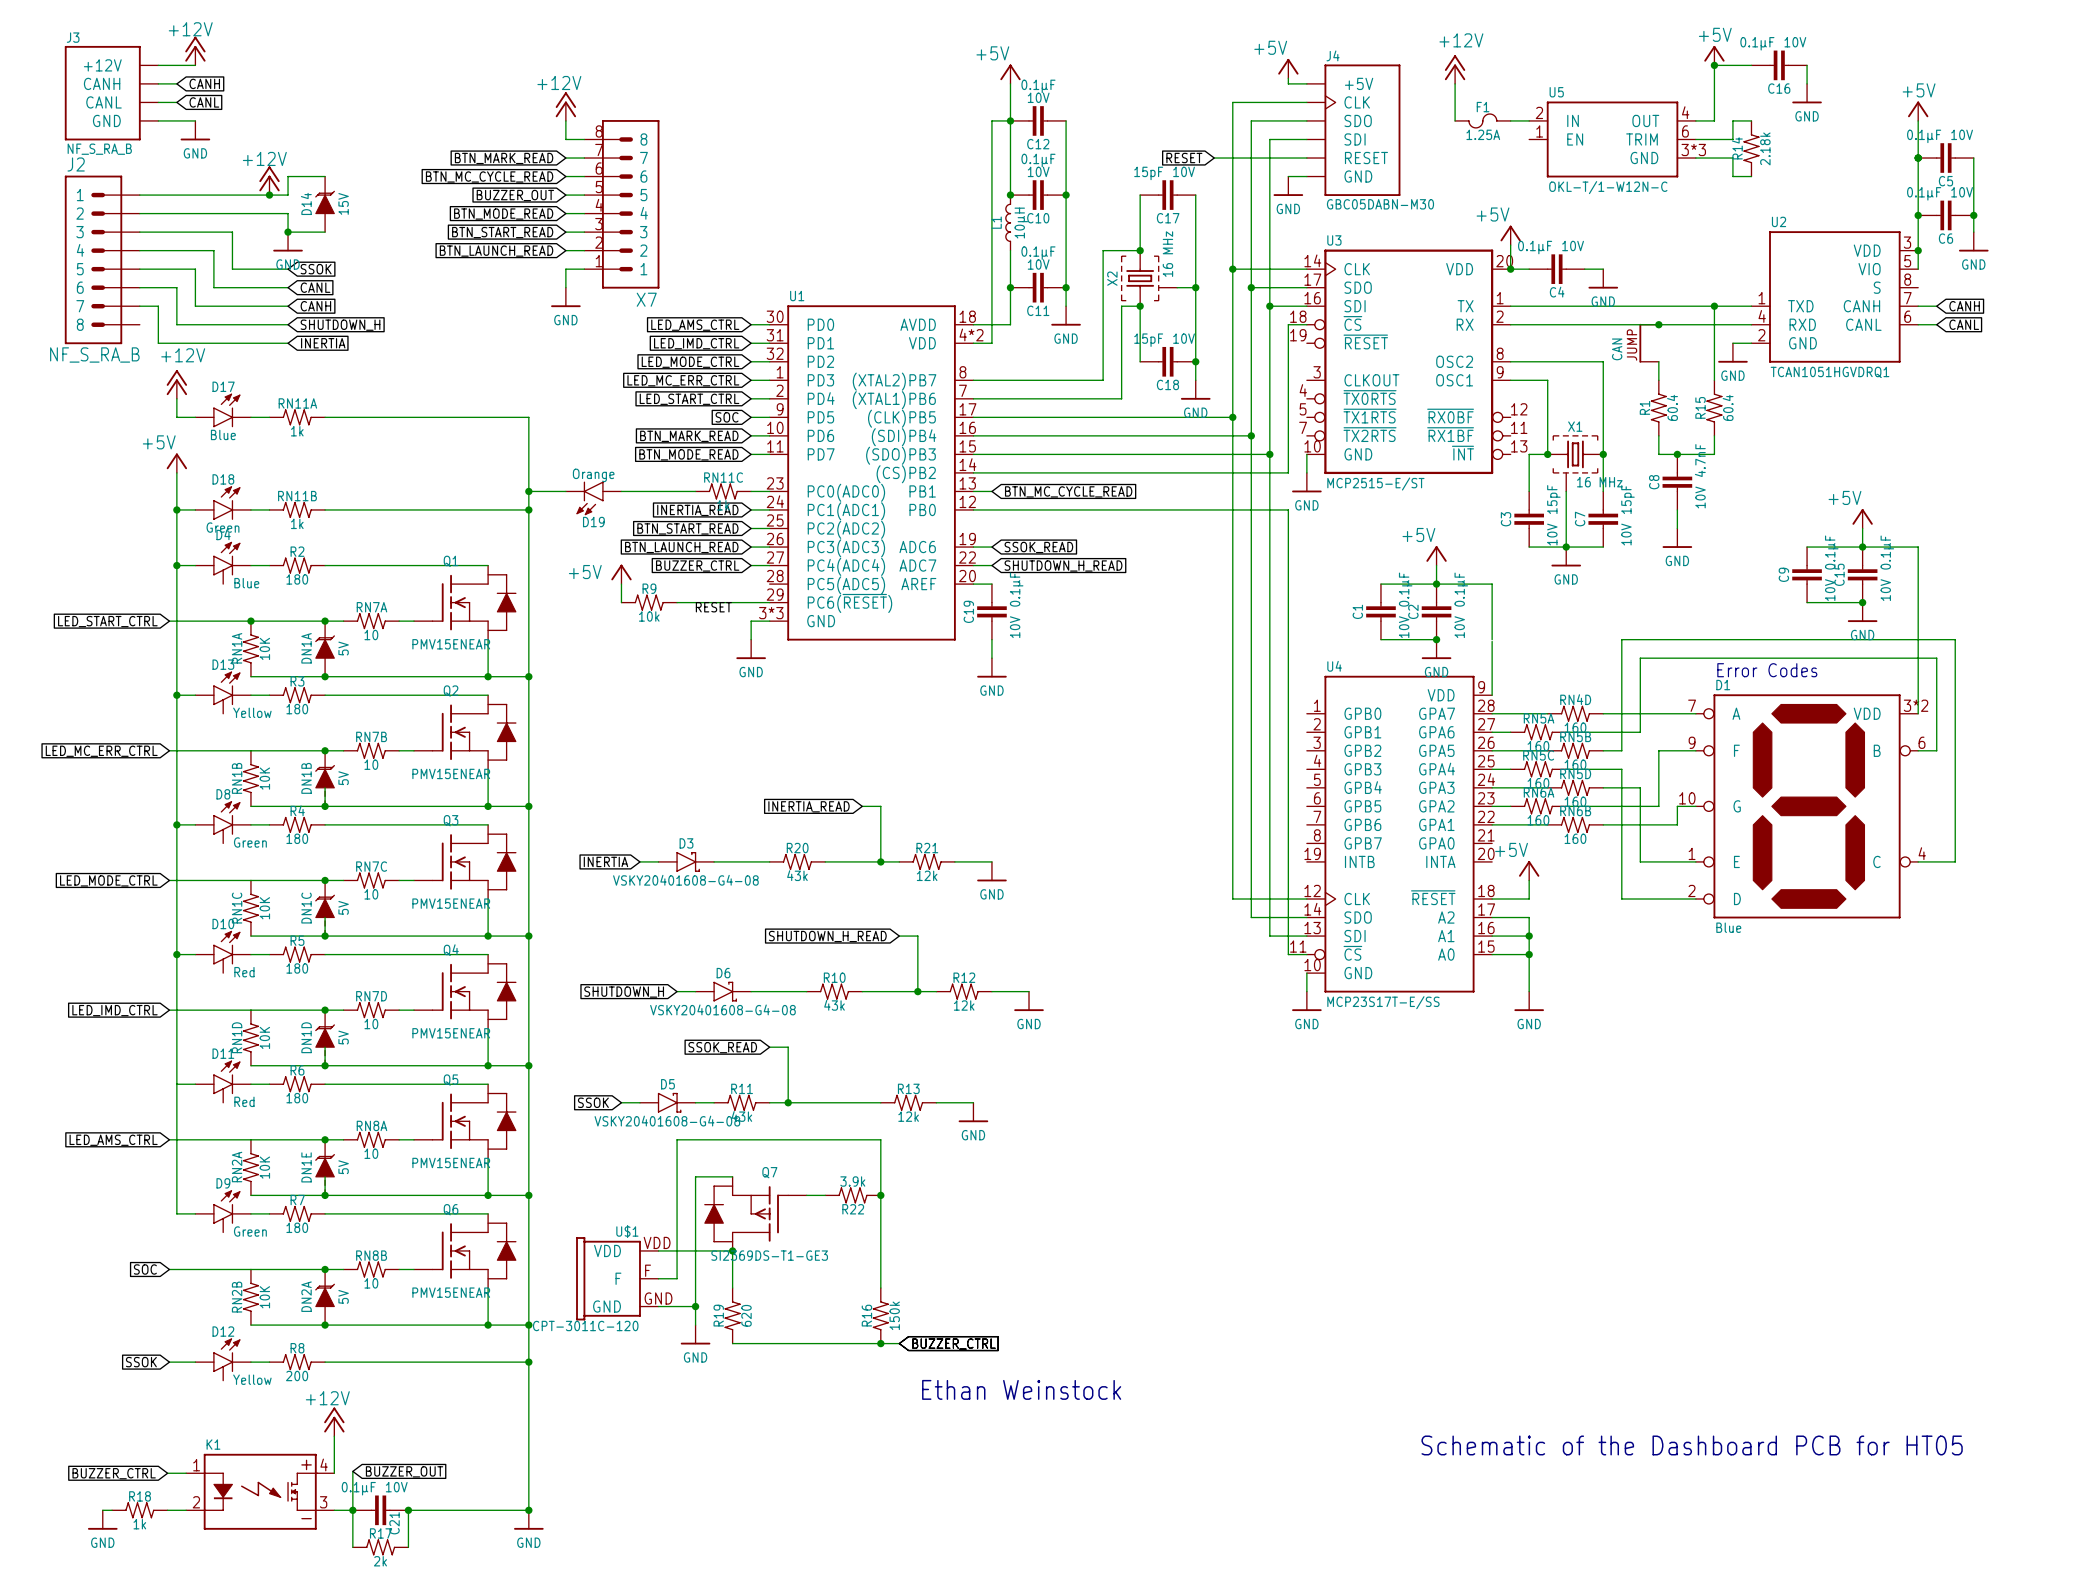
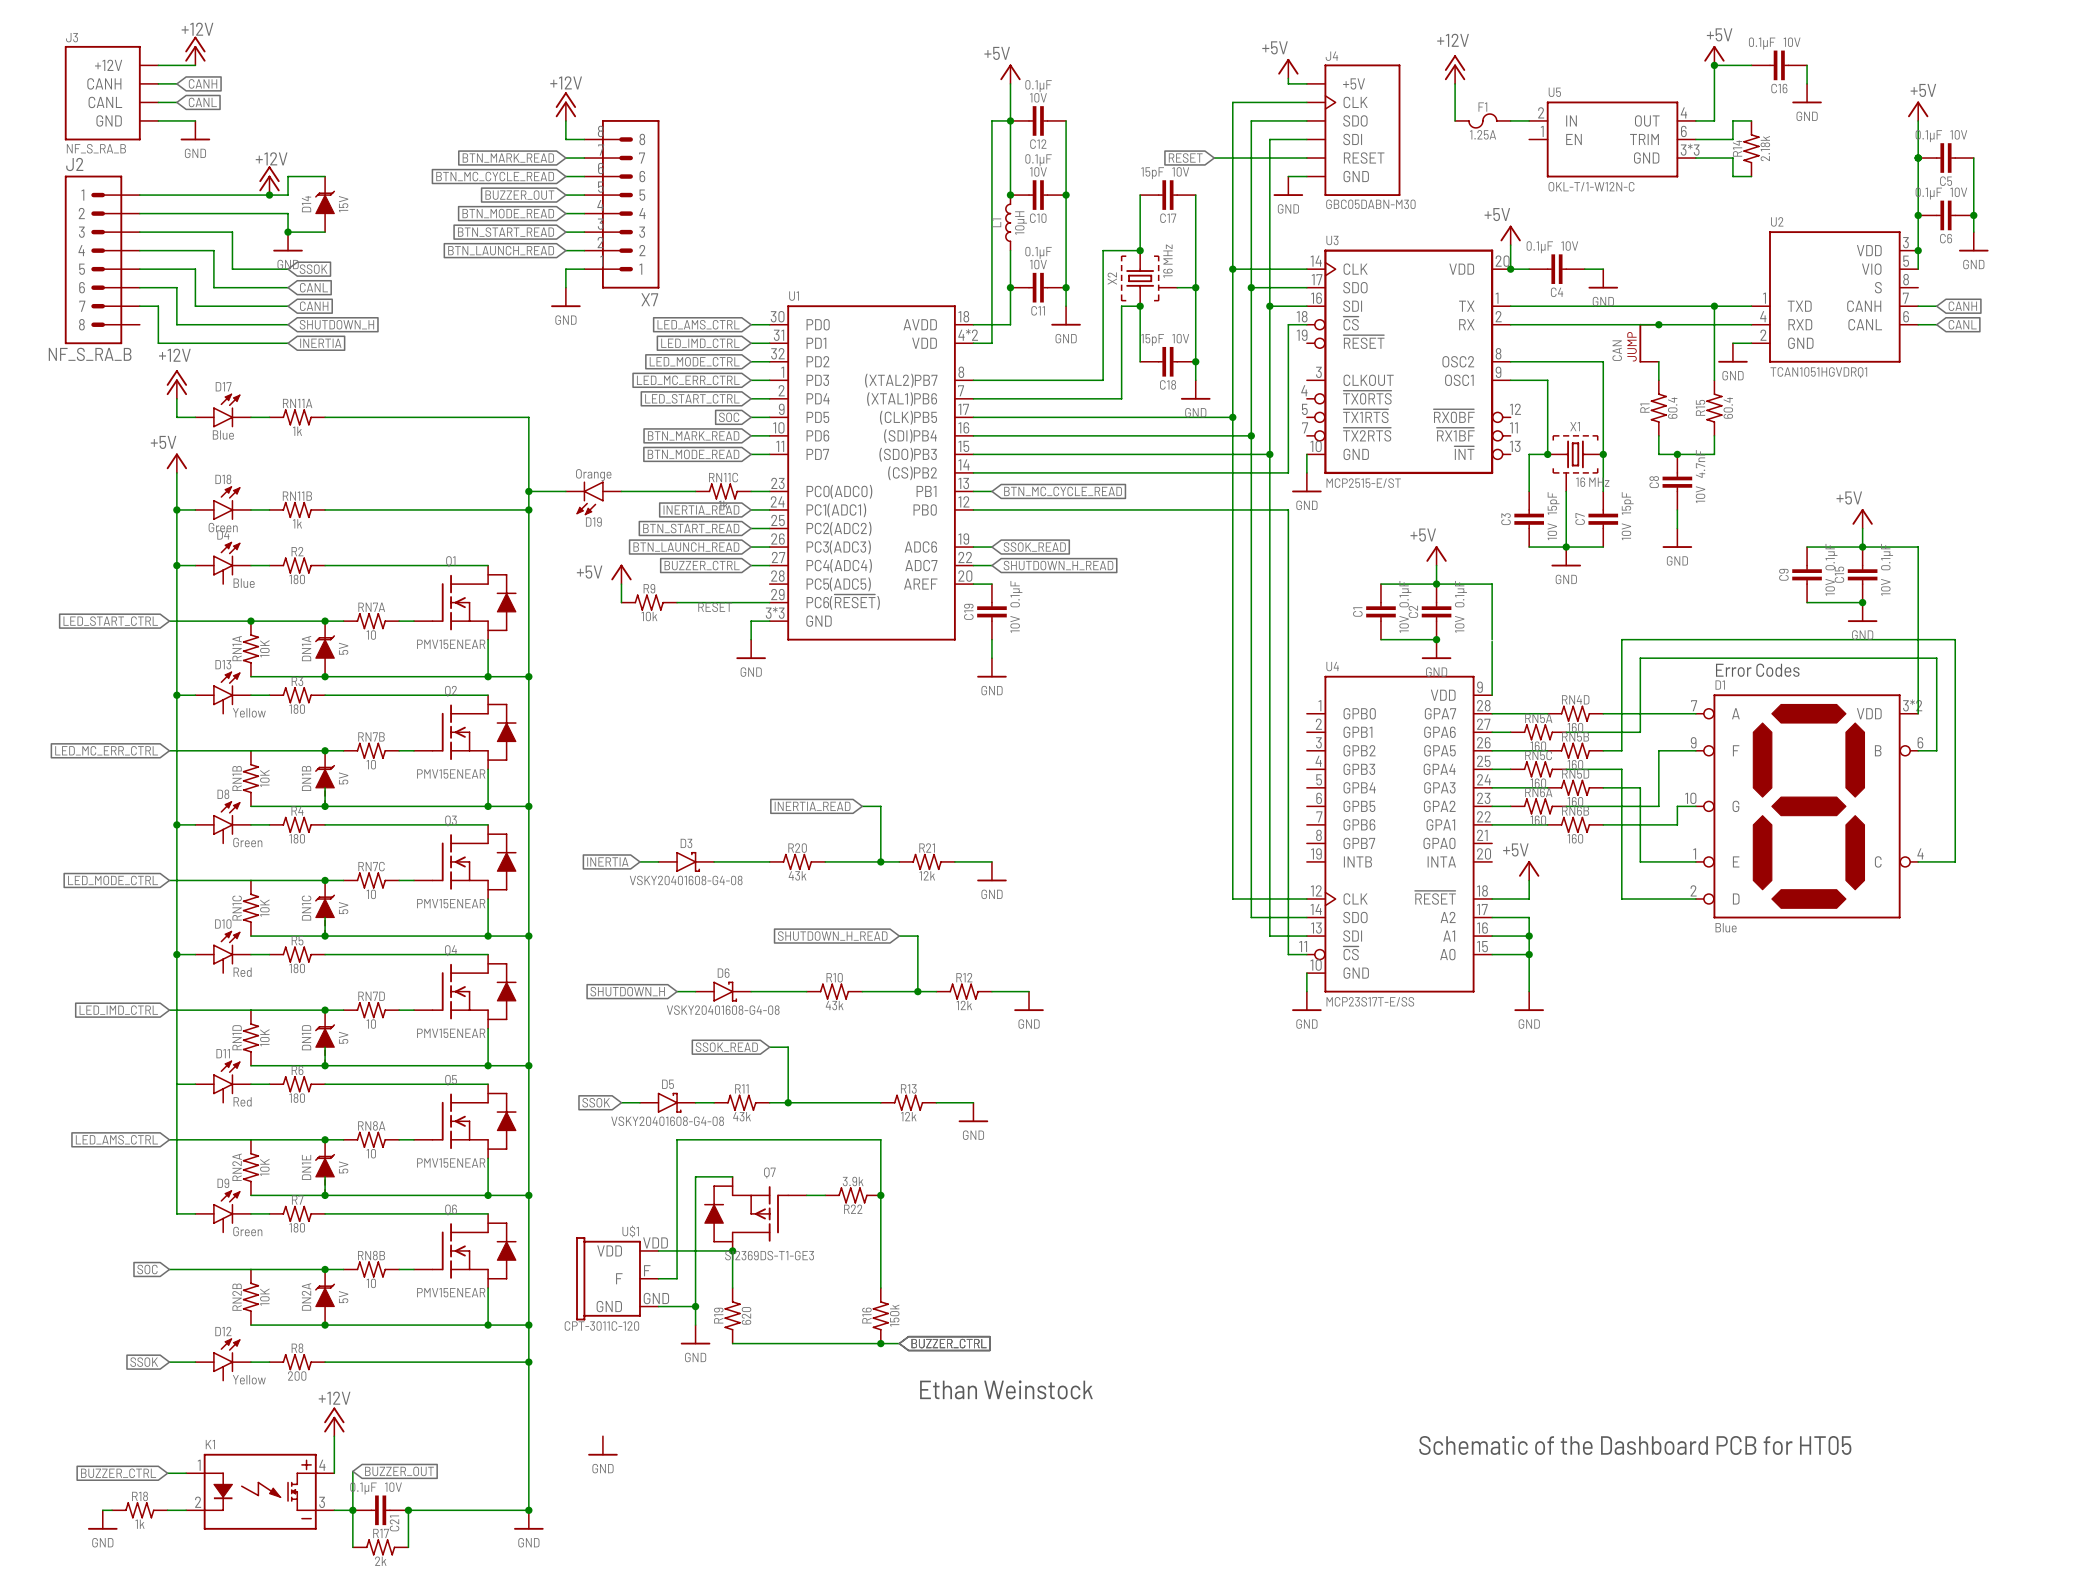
power symbol: none -> GND (602, 1445)

